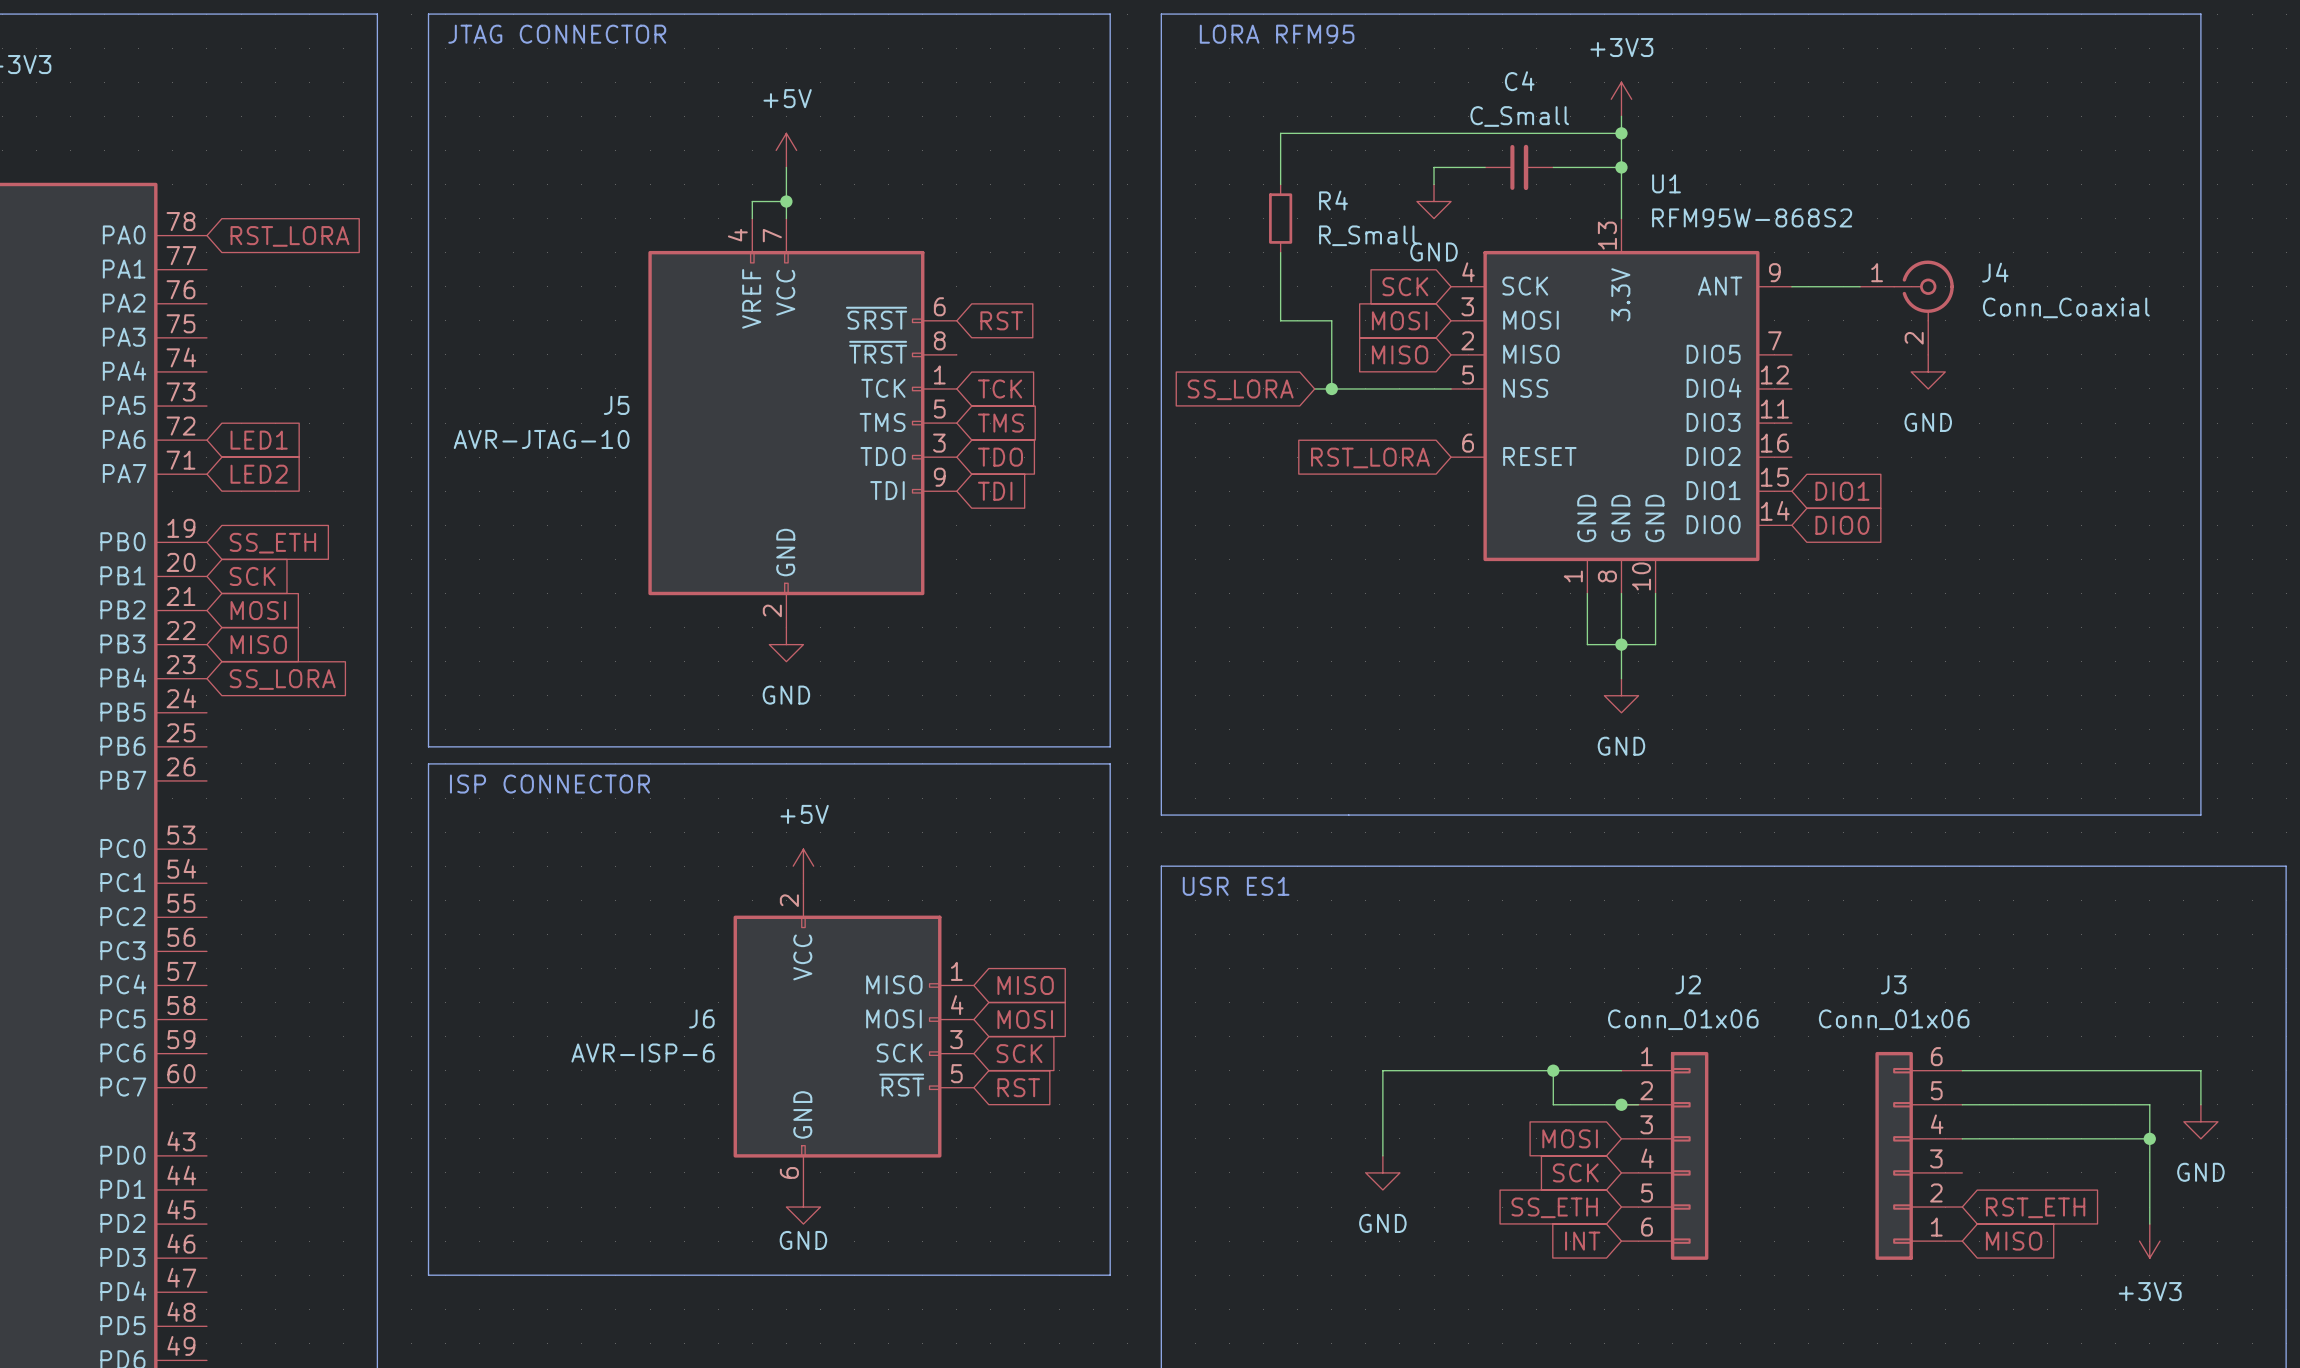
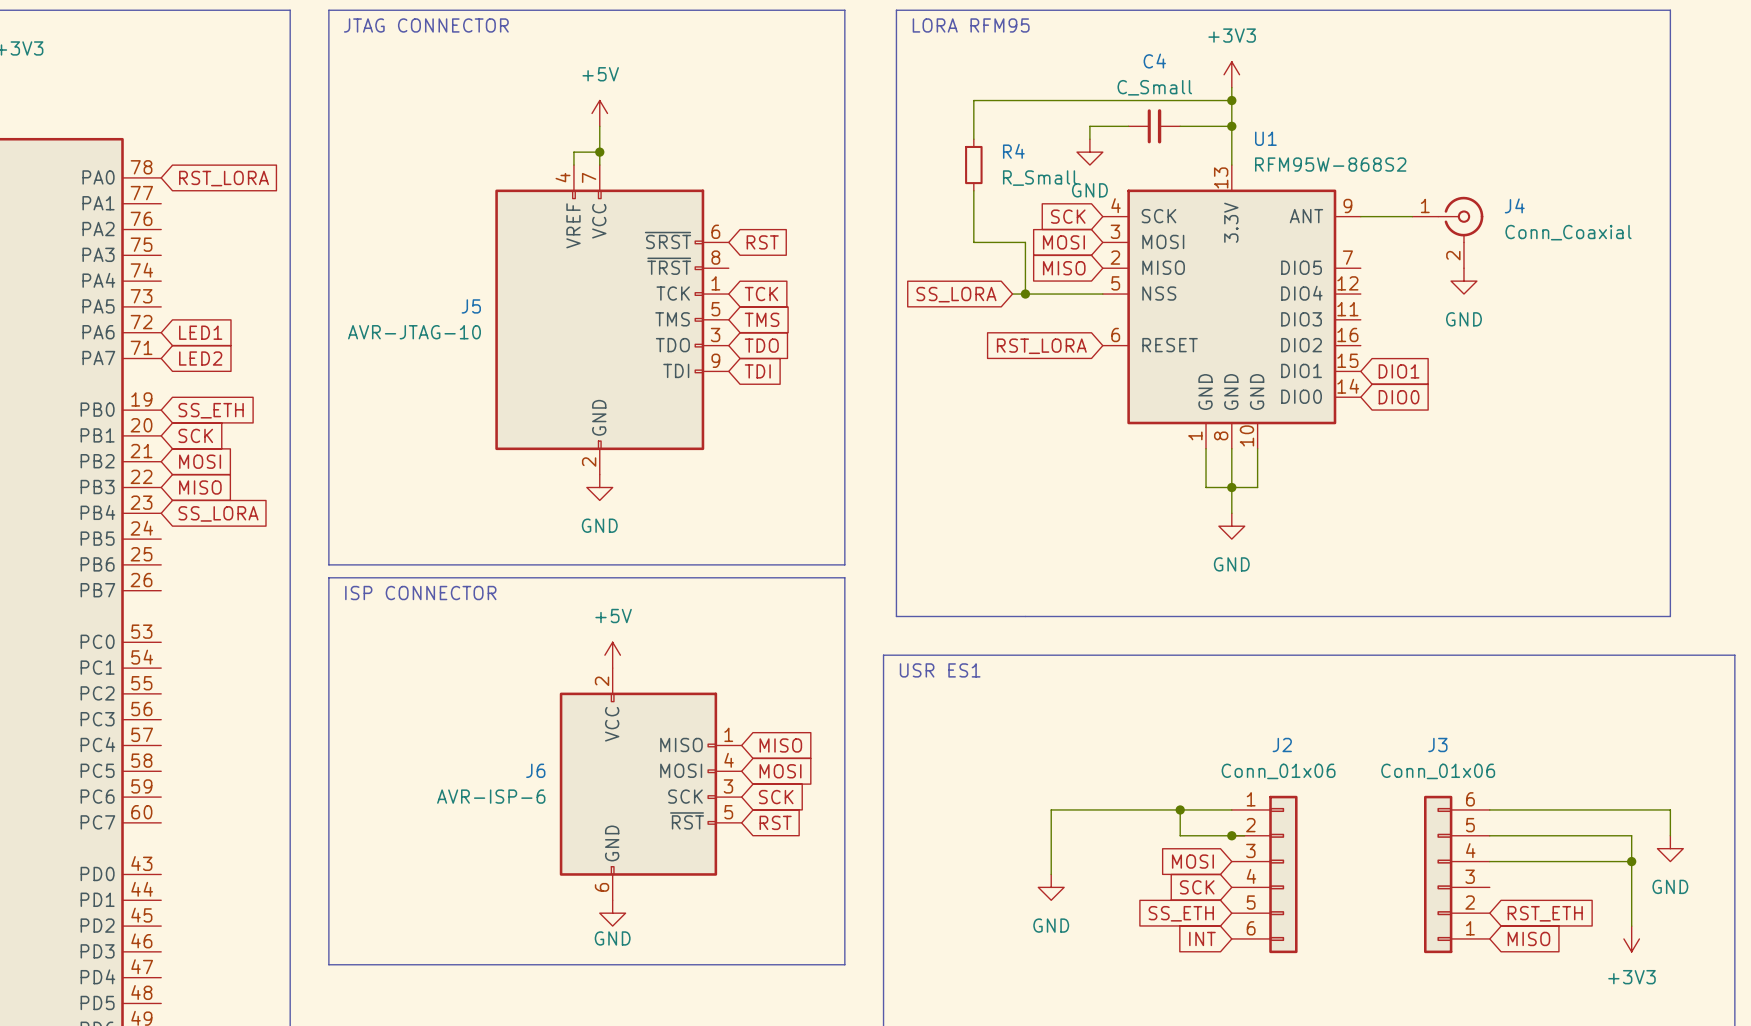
line: (1178, 14) (1161, 14) (1161, 815) (1178, 815) -> (896, 10) (896, 616)
wire: (1331, 320) (1331, 388) (1314, 388) -> (1012, 242) (1025, 242) (1025, 294)
junction position: (1331, 388) -> (1025, 294)
global label position: SS_LORA (1240, 389) -> SS_LORA (956, 294)

